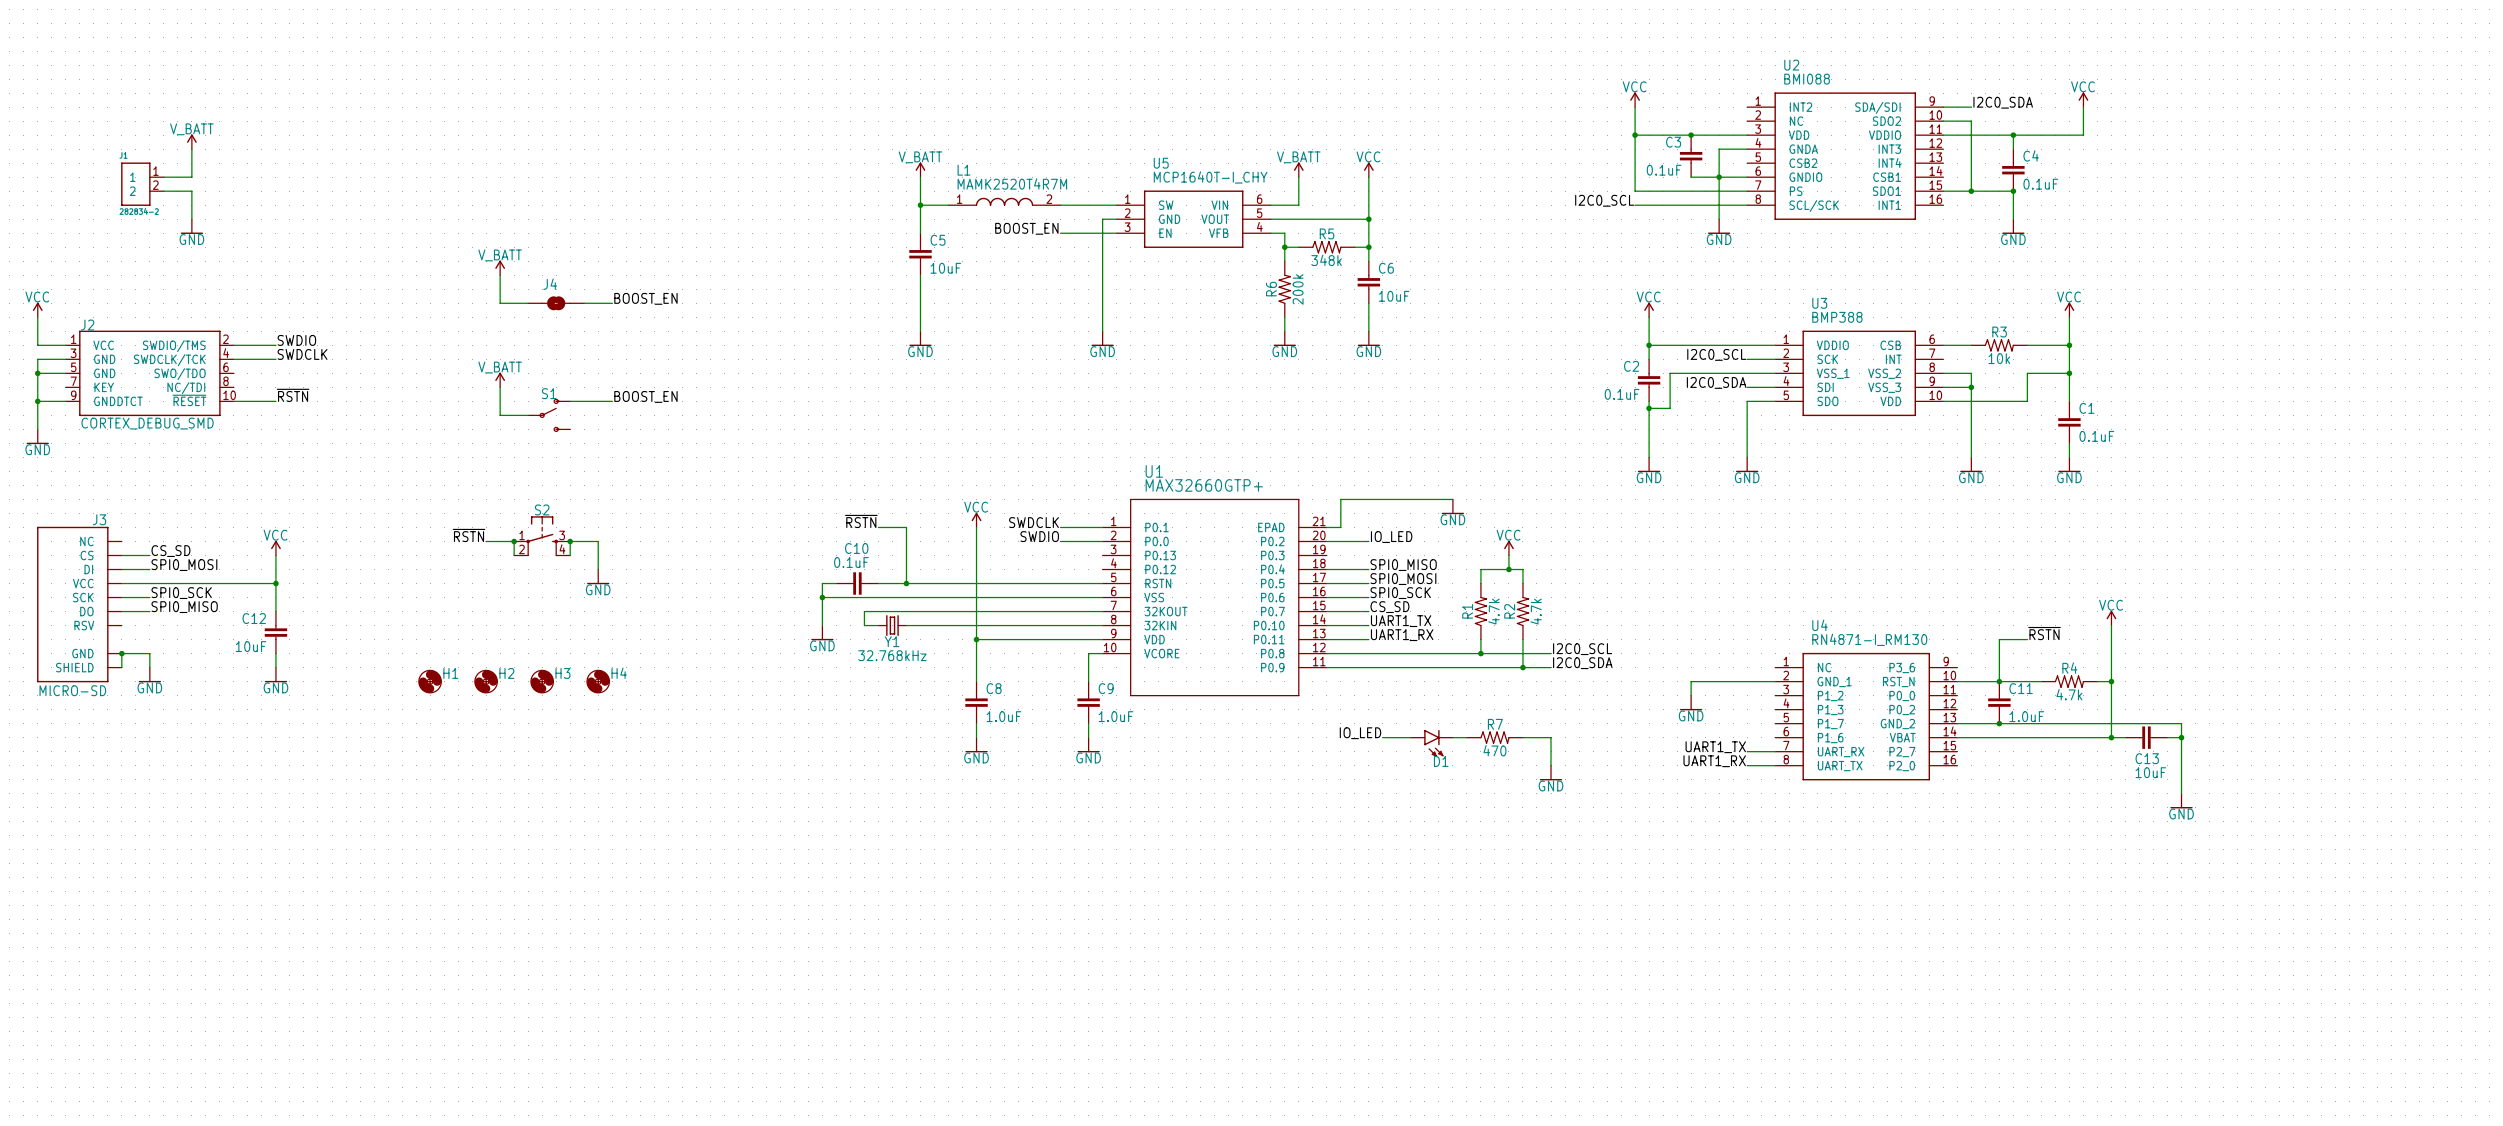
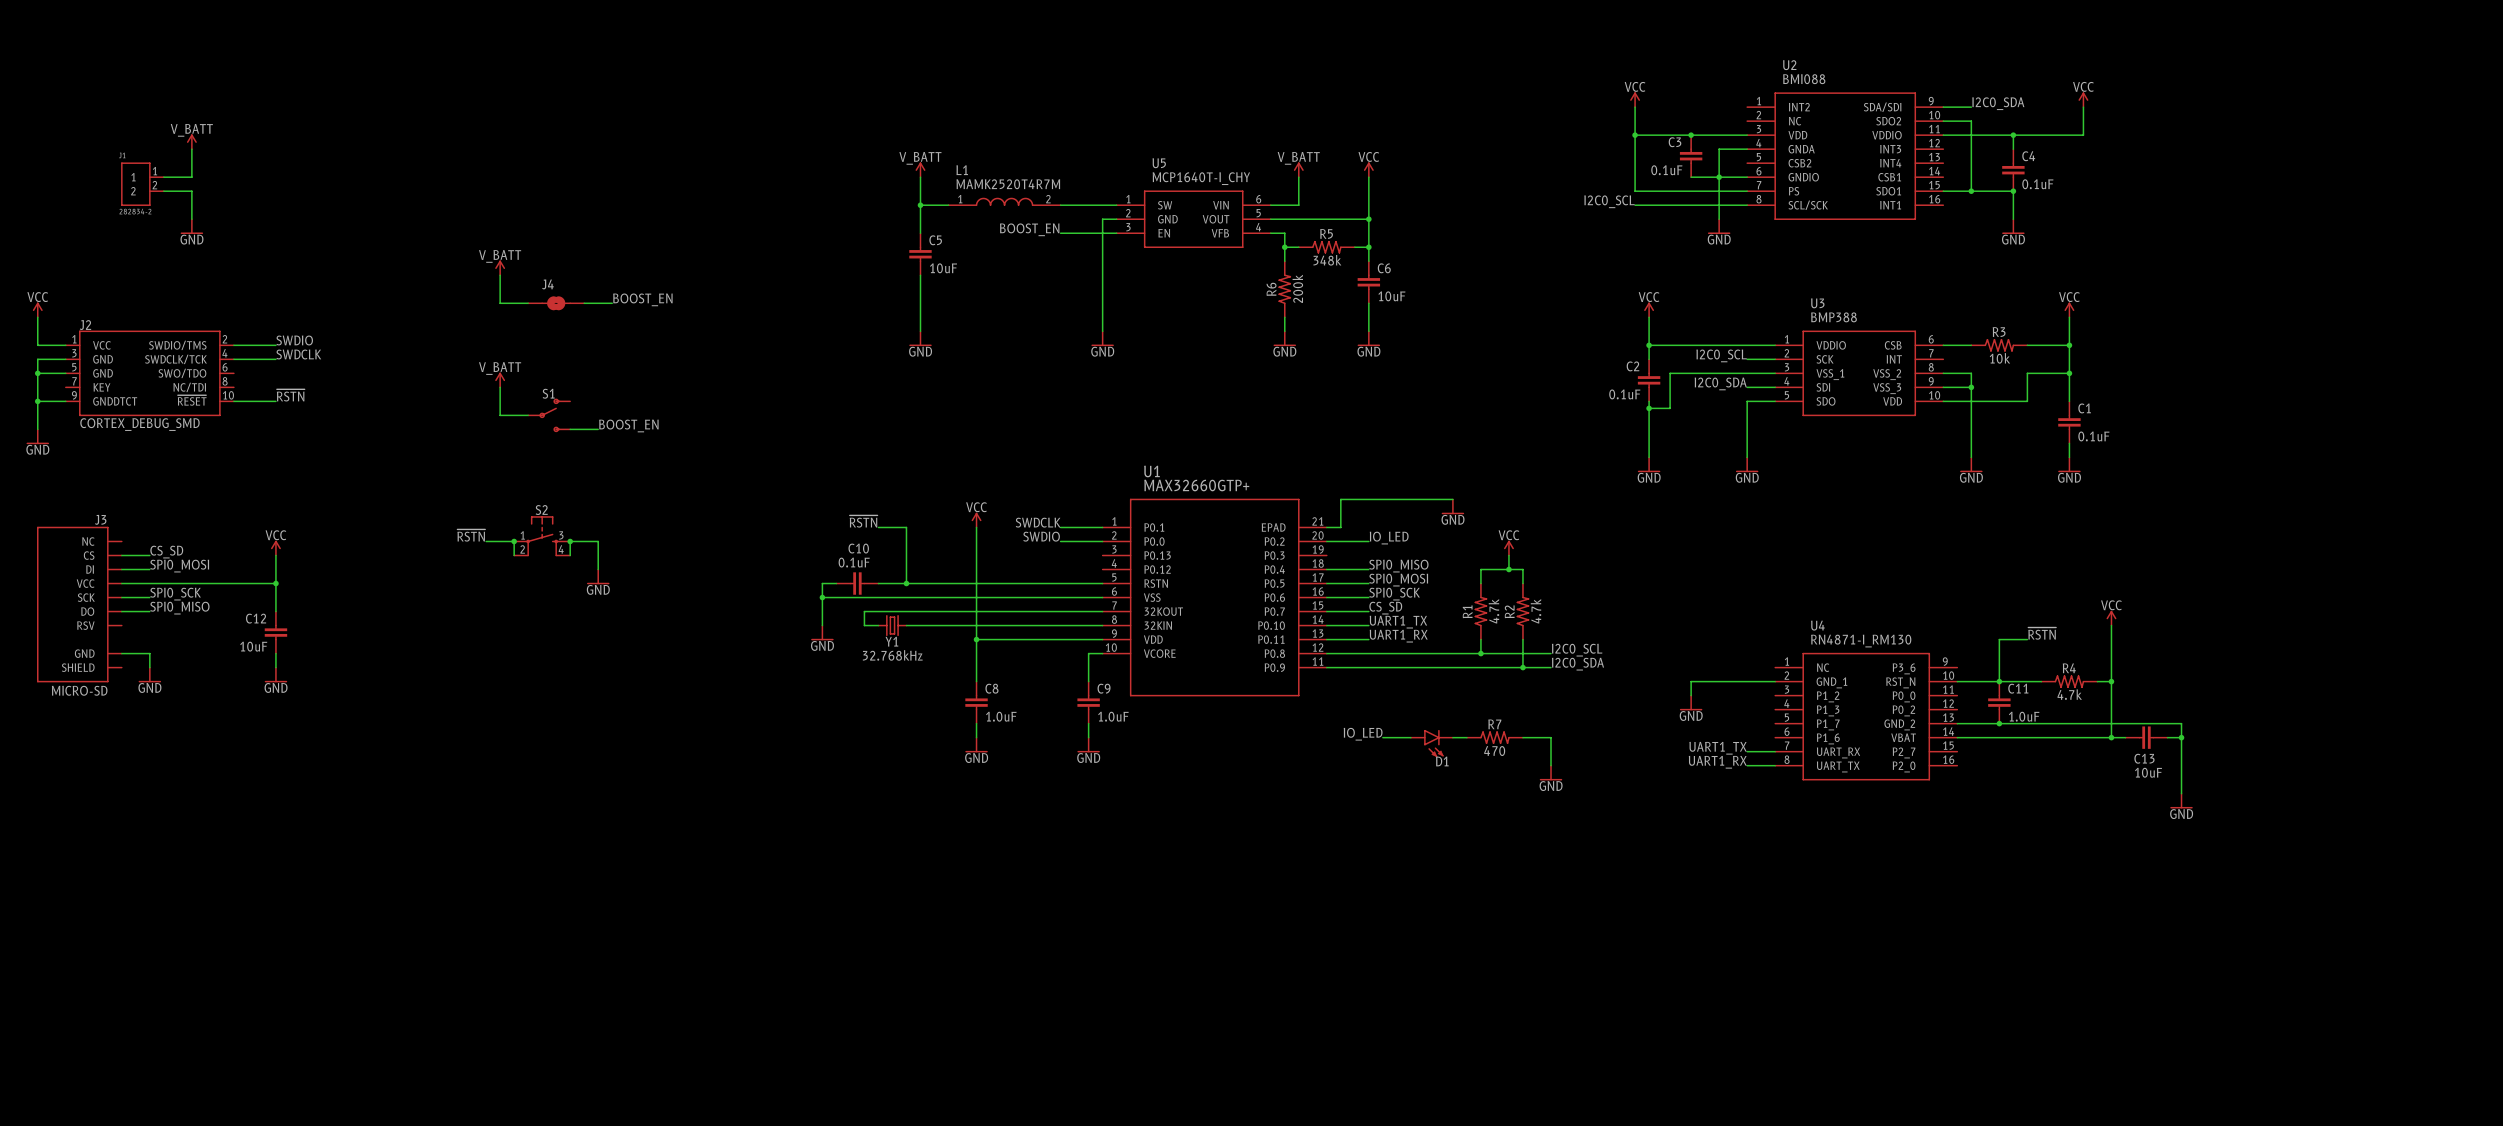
label position: BOOST_EN (645, 396) -> BOOST_EN (628, 425)
wire: (570, 401) (612, 401) -> none
wire: none -> (570, 429) (598, 429)
wire: (121, 653) (121, 667) -> none
junction: (121, 653) -> none
H1: (430, 681) -> none
H2: (486, 681) -> none
H3: (542, 681) -> none
H4: (598, 681) -> none

